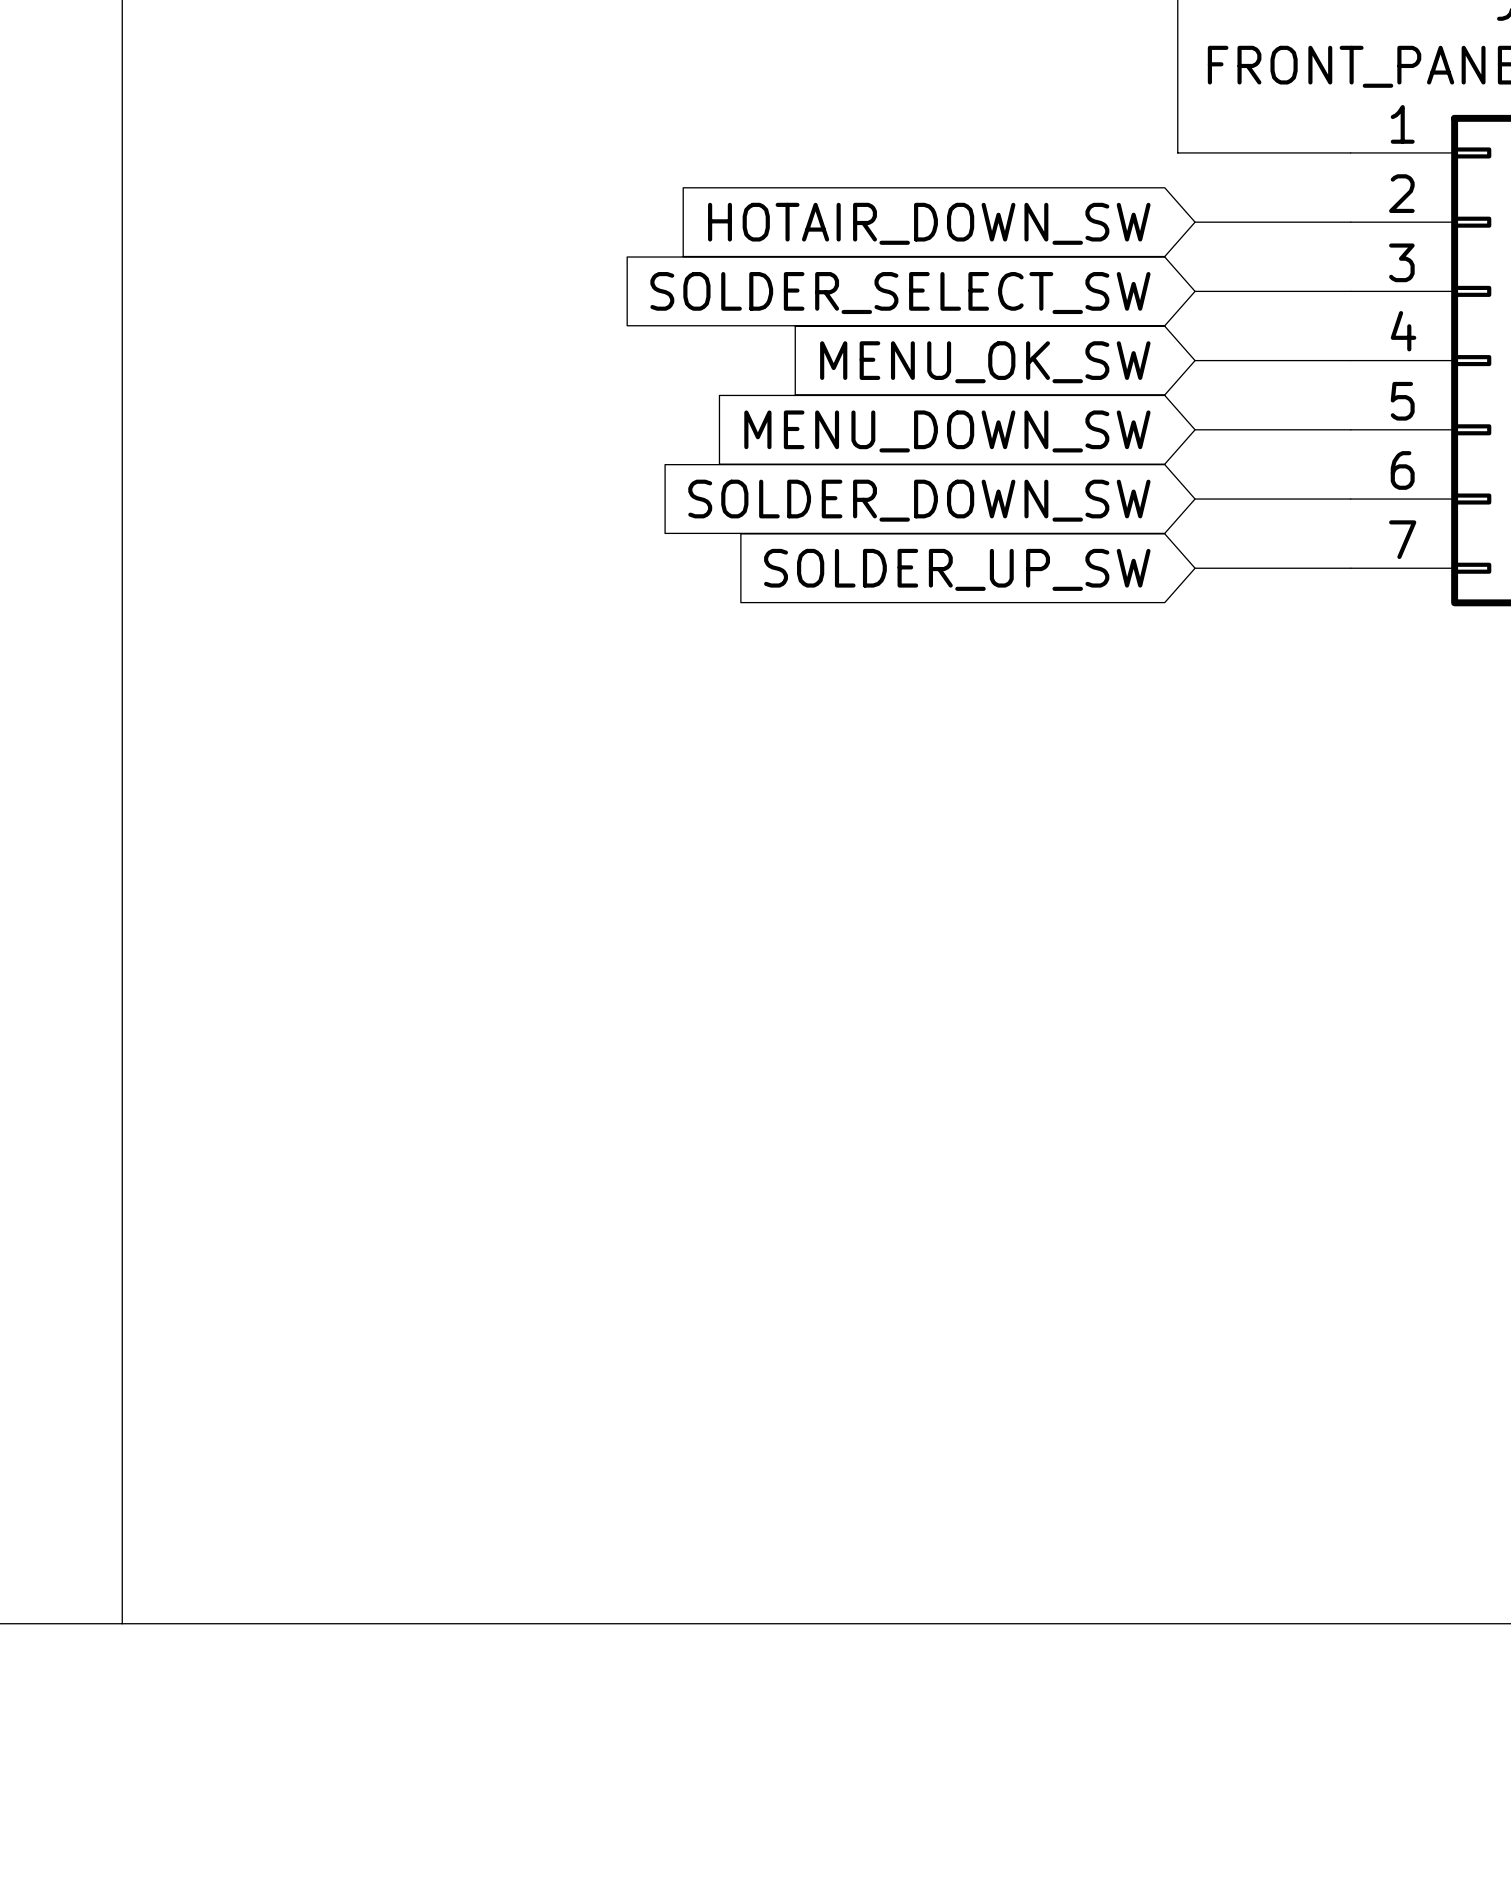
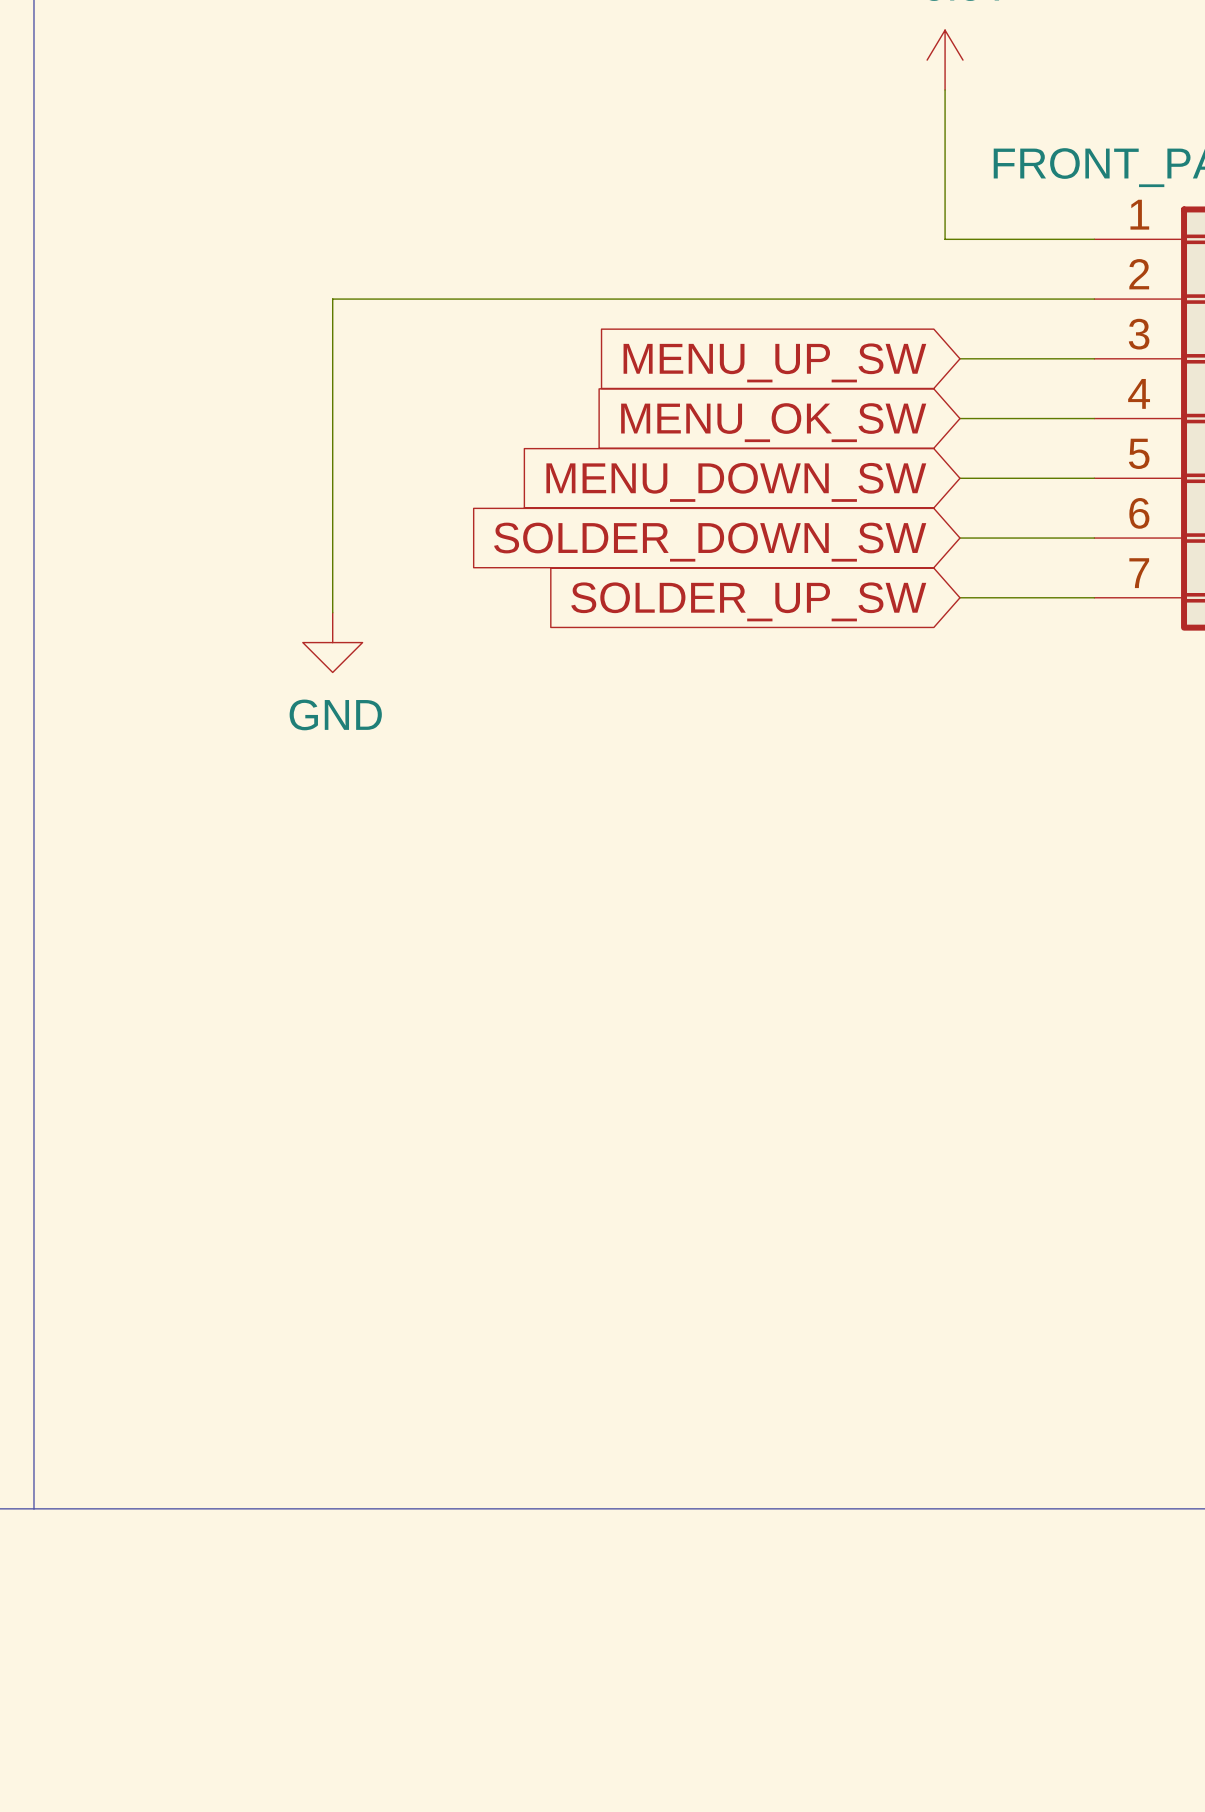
wire: none -> (959, 299) (332, 299) (332, 612)
global label: HOTAIR_DOWN_SW (929, 223) -> none
global label: SOLDER_SELECT_SW (900, 293) -> MENU_UP_SW (774, 362)
power symbol: none -> GND (332, 642)

